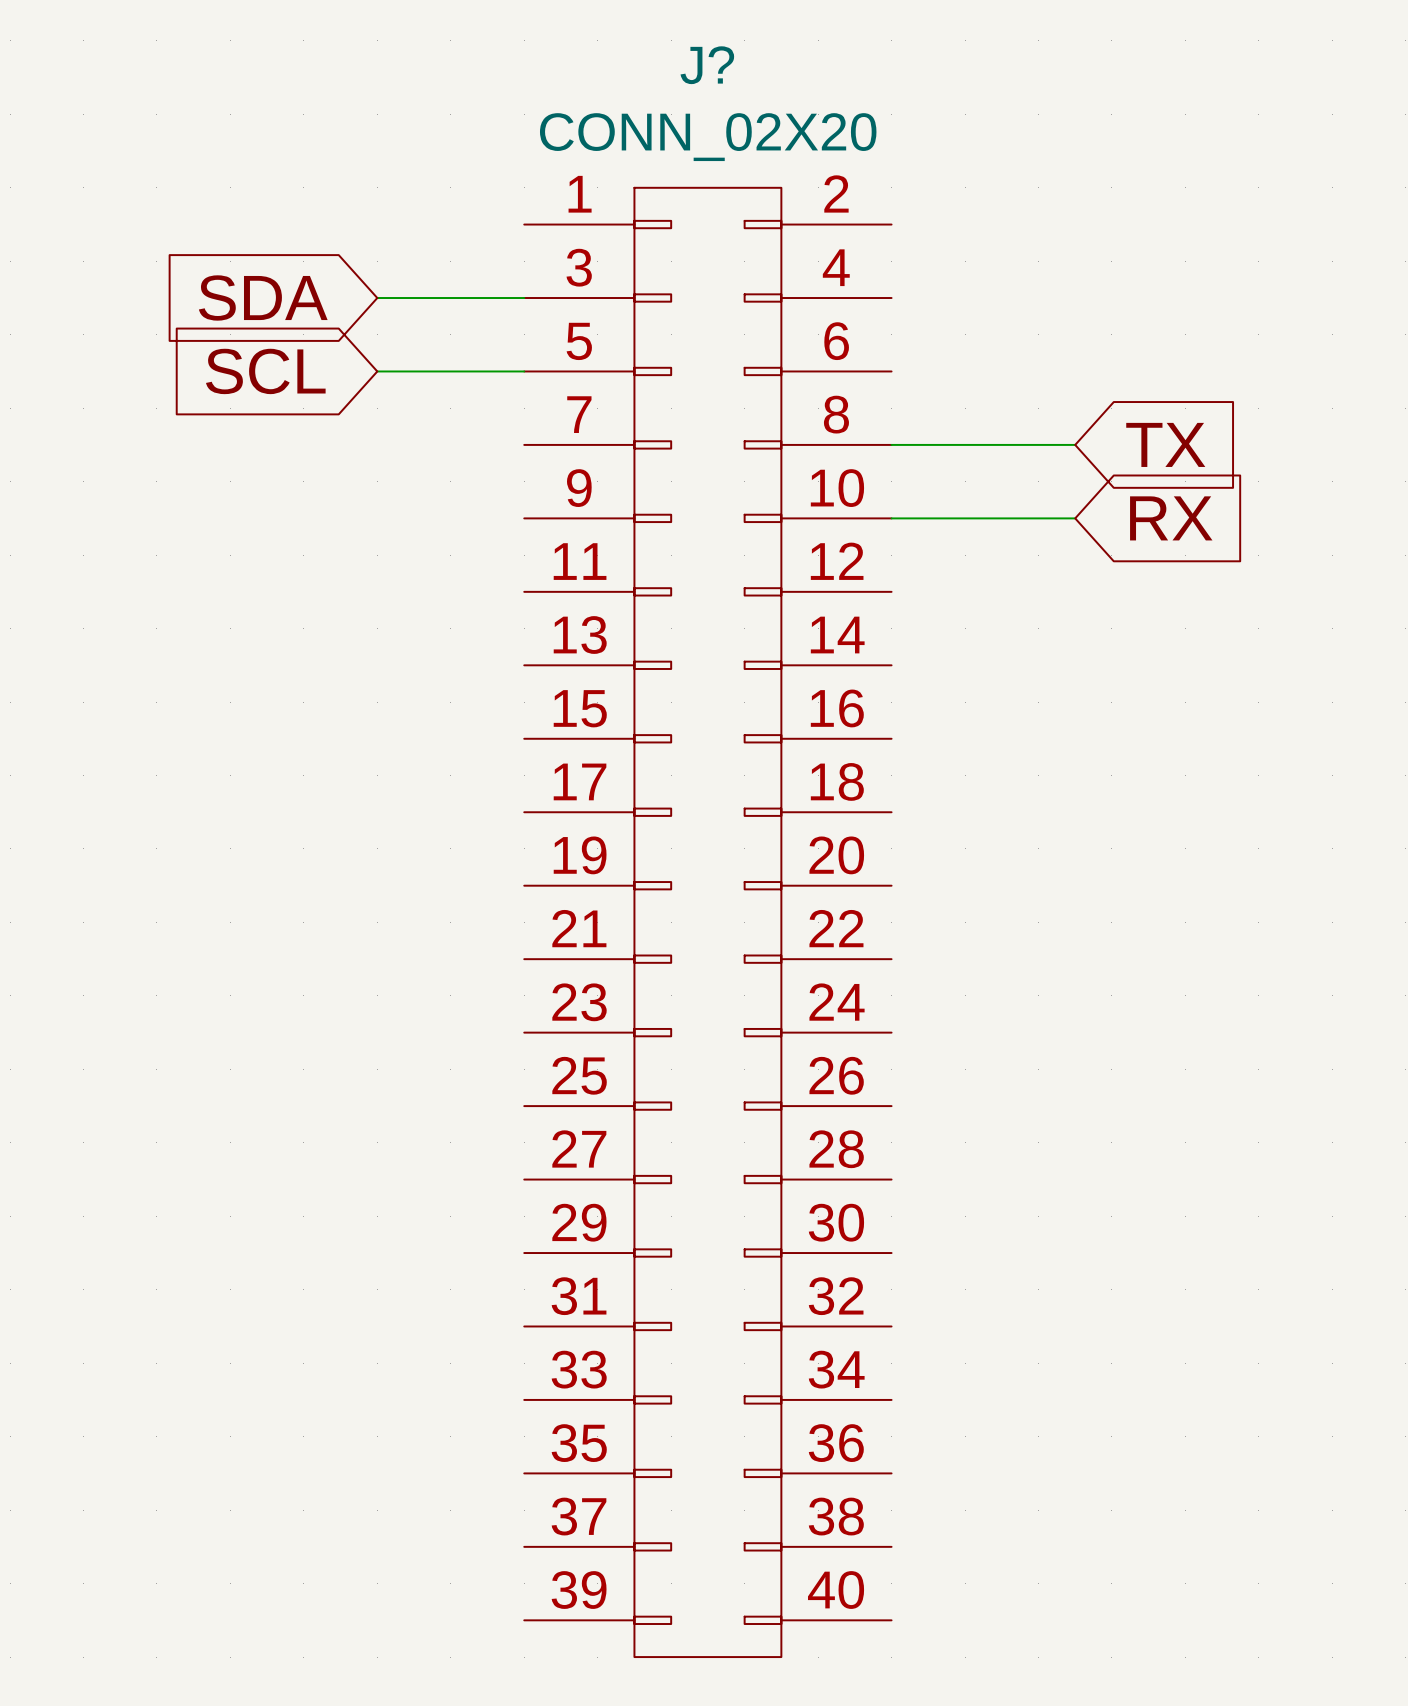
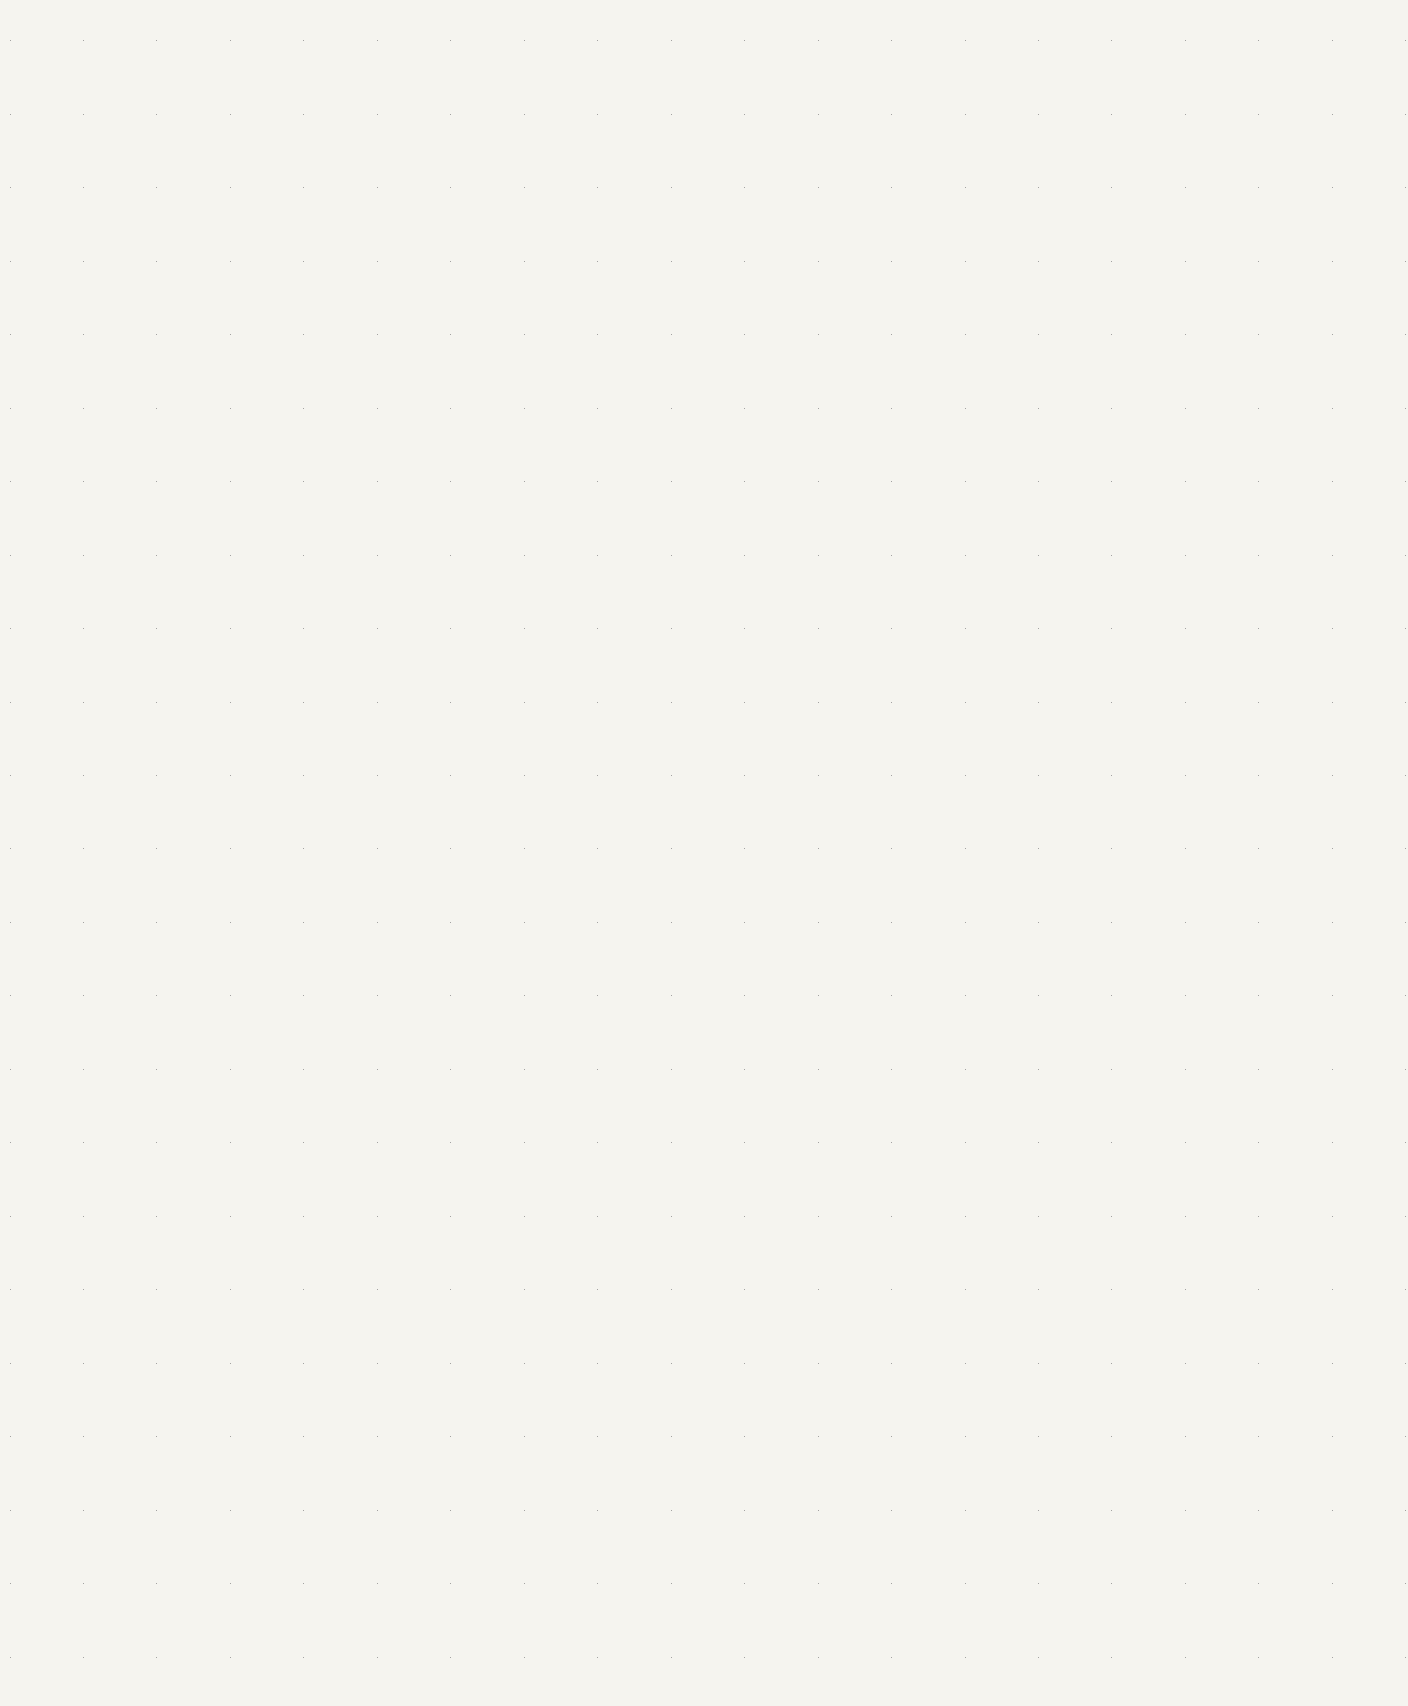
global label: SDA (263, 297) -> none
wire: (377, 298) (524, 298) -> none
global label: SCL (265, 371) -> none
wire: (377, 371) (524, 371) -> none
wire: (891, 444) (1075, 444) -> none
global label: TX (1165, 444) -> none
wire: (891, 518) (1075, 518) -> none
global label: RX (1171, 518) -> none
J?: CONN_02X20 (707, 922) -> none

